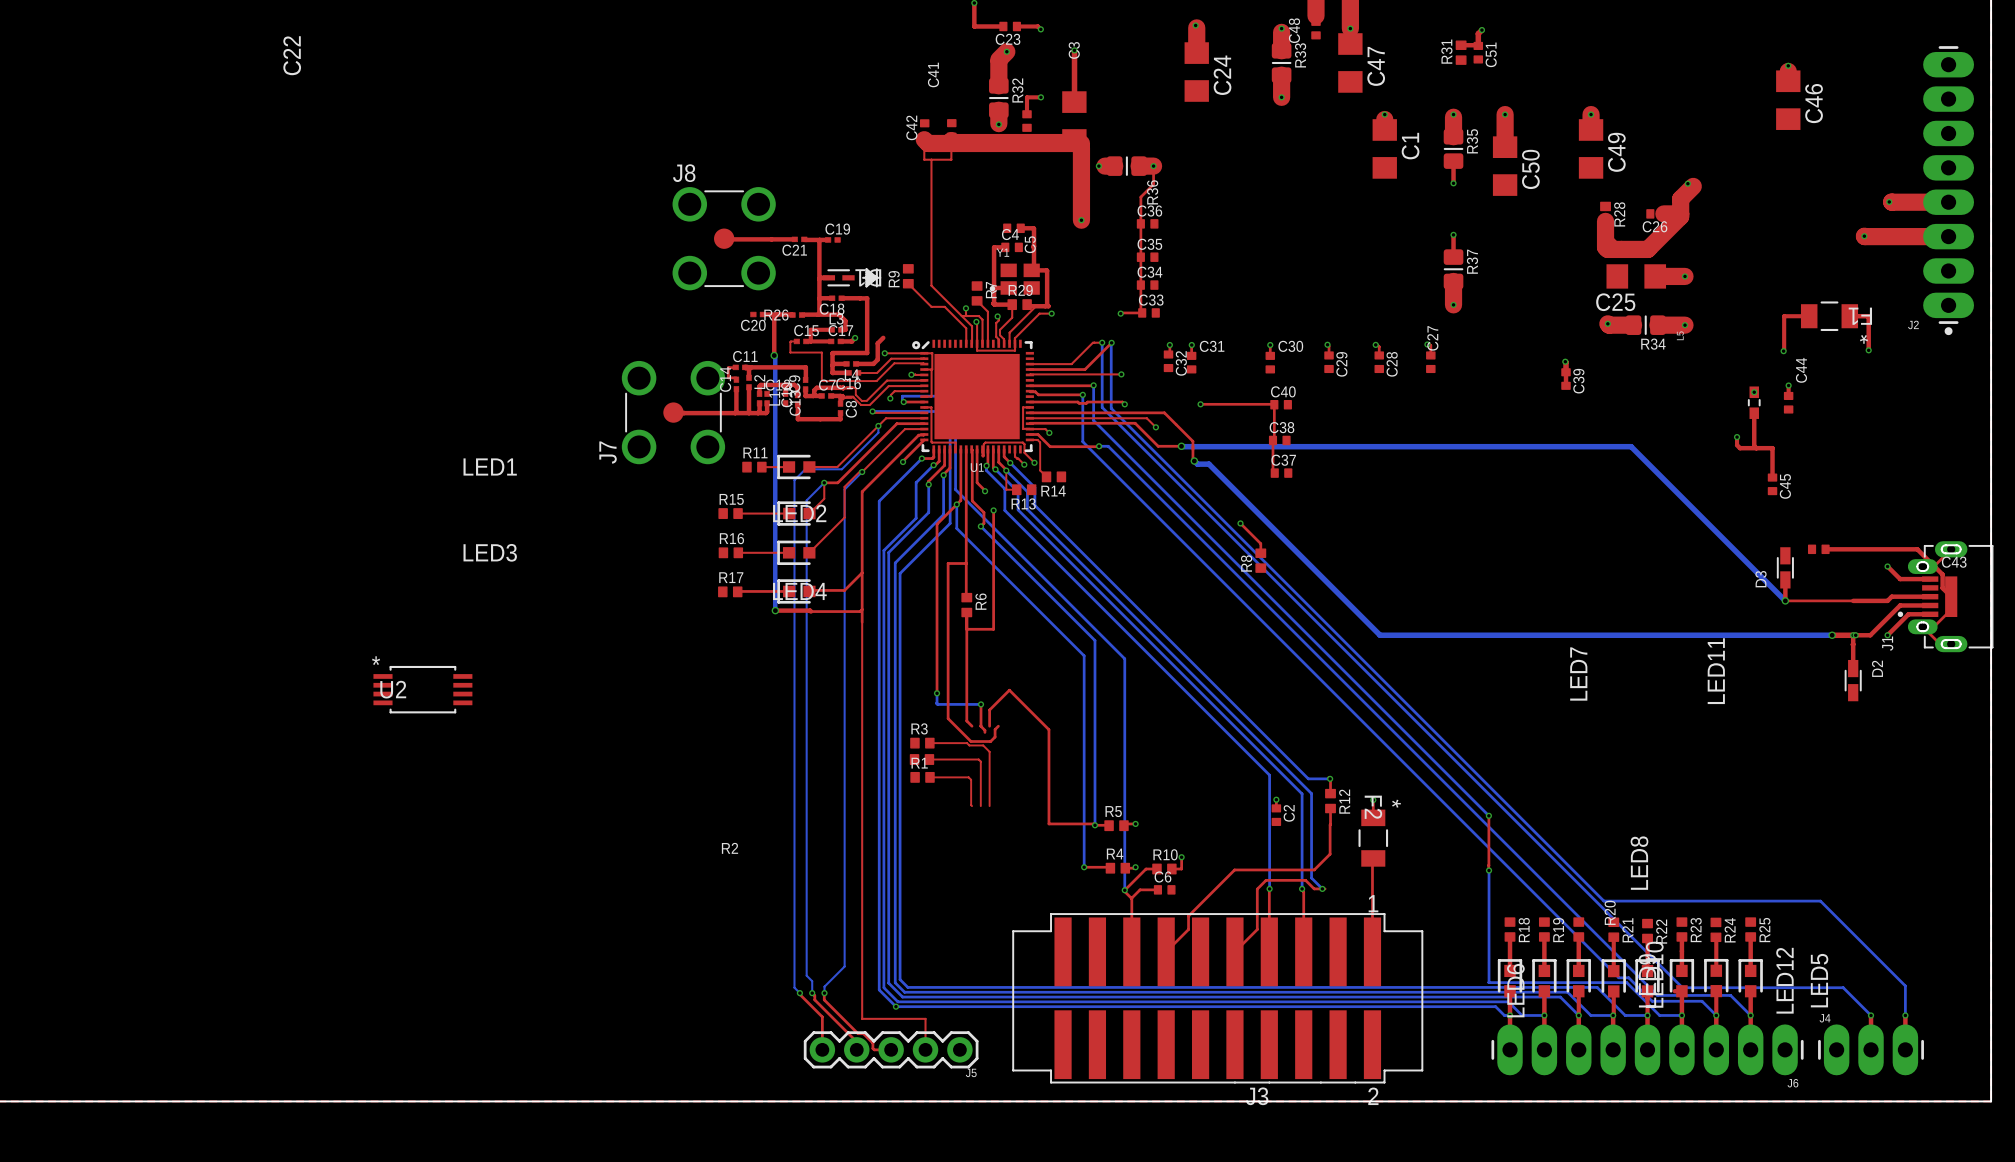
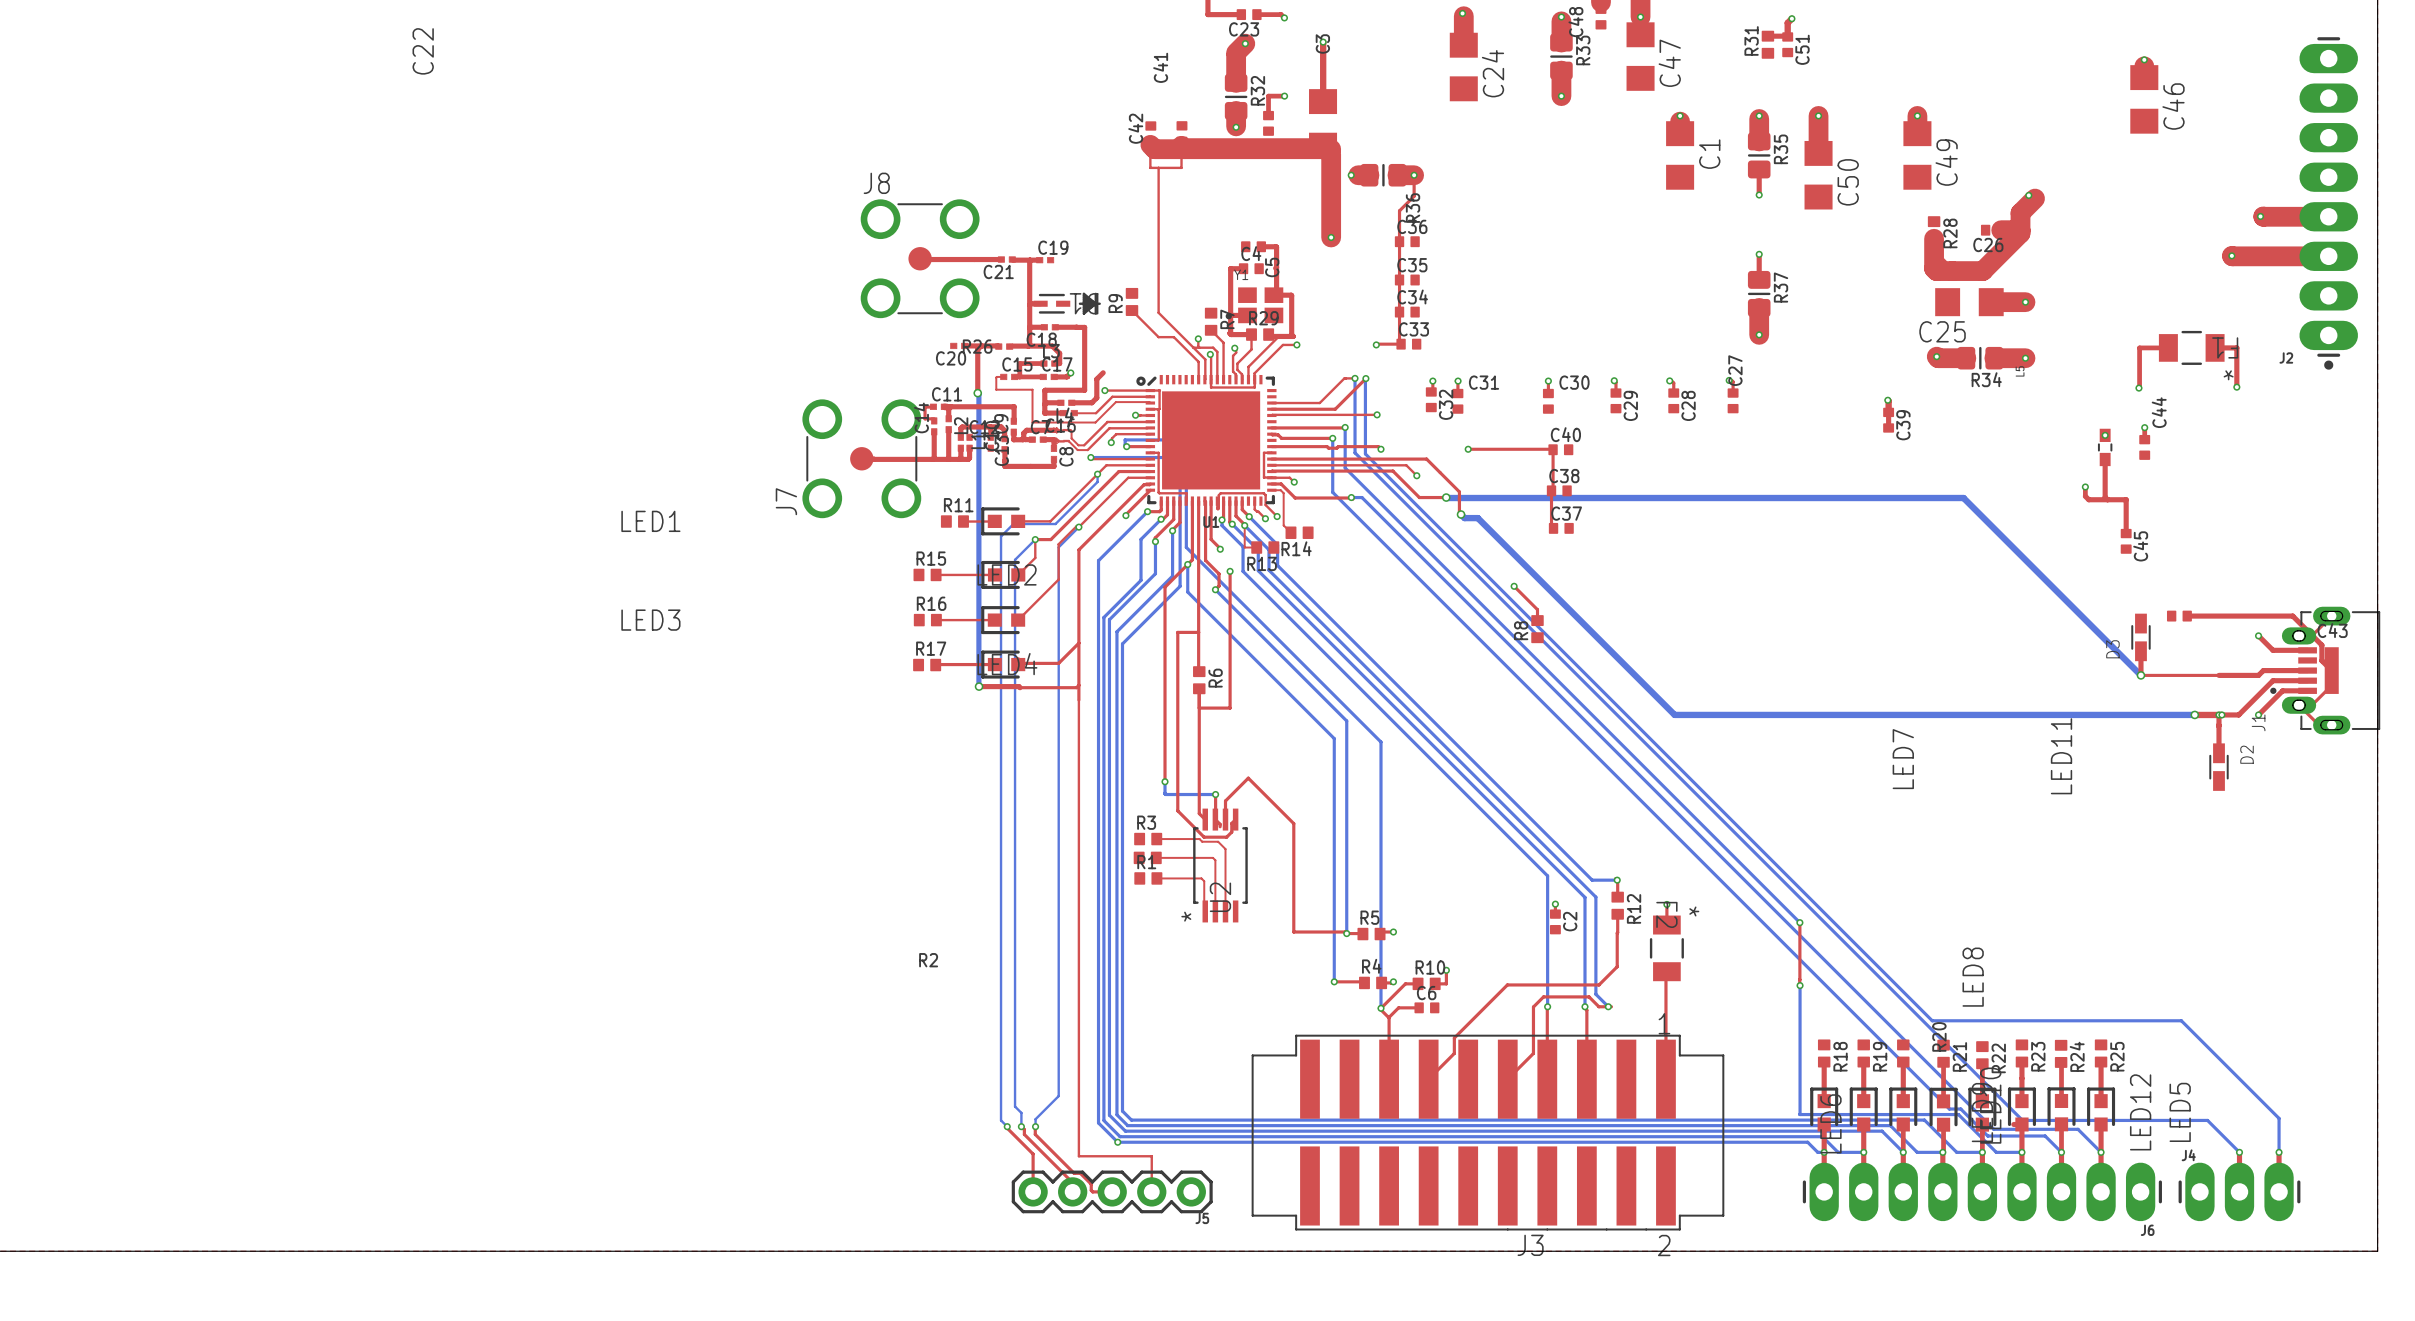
U2 rotation: 0° (422, 689) -> 90° counterclockwise (1220, 865)
U2 position: (422, 689) -> (1220, 865)

